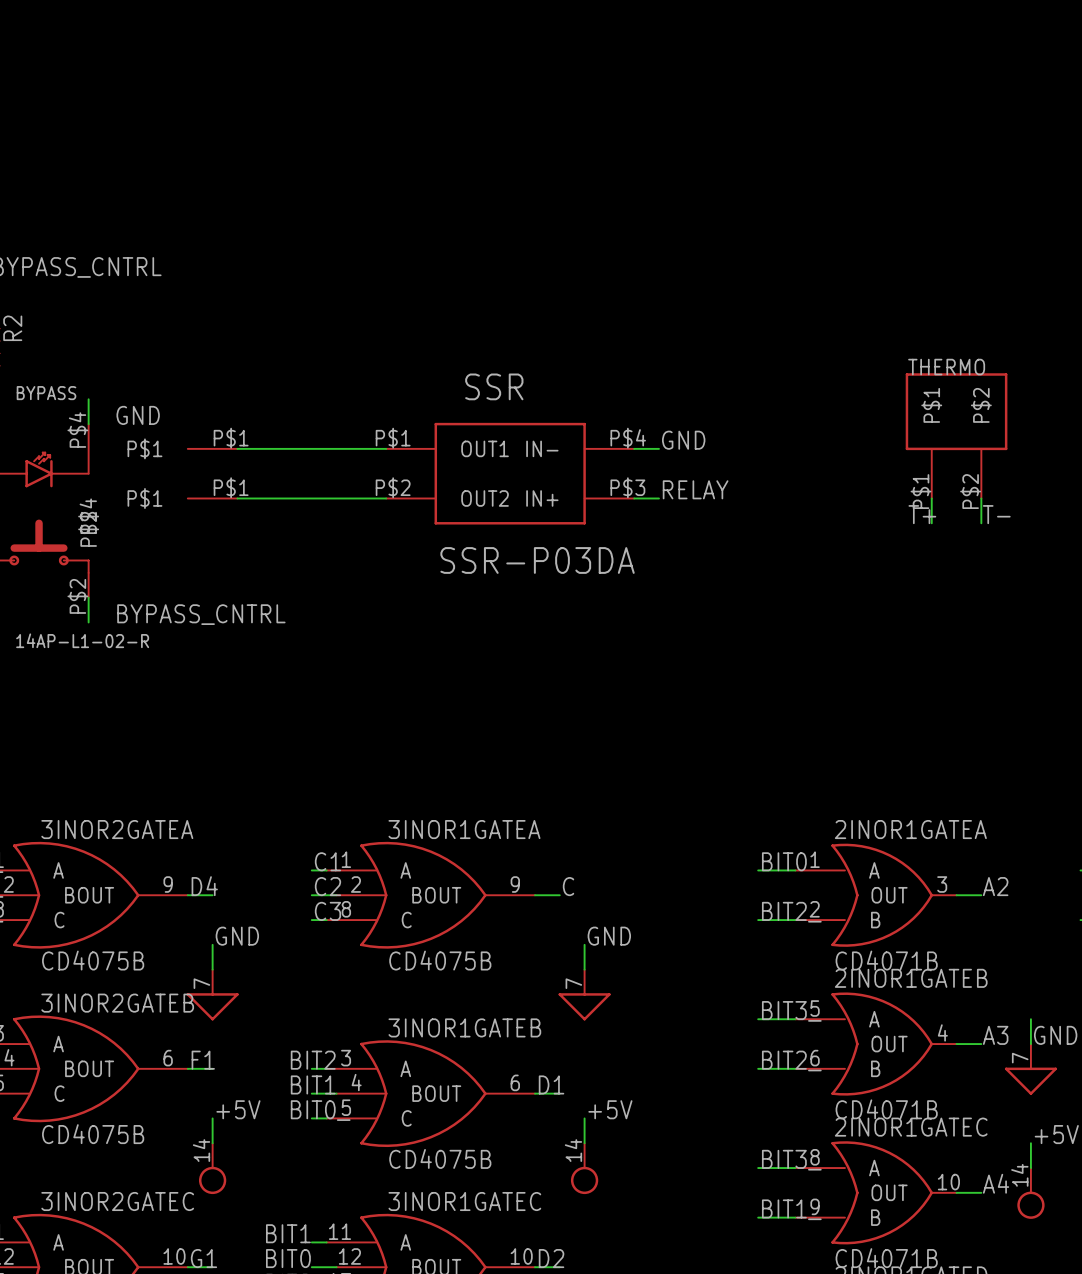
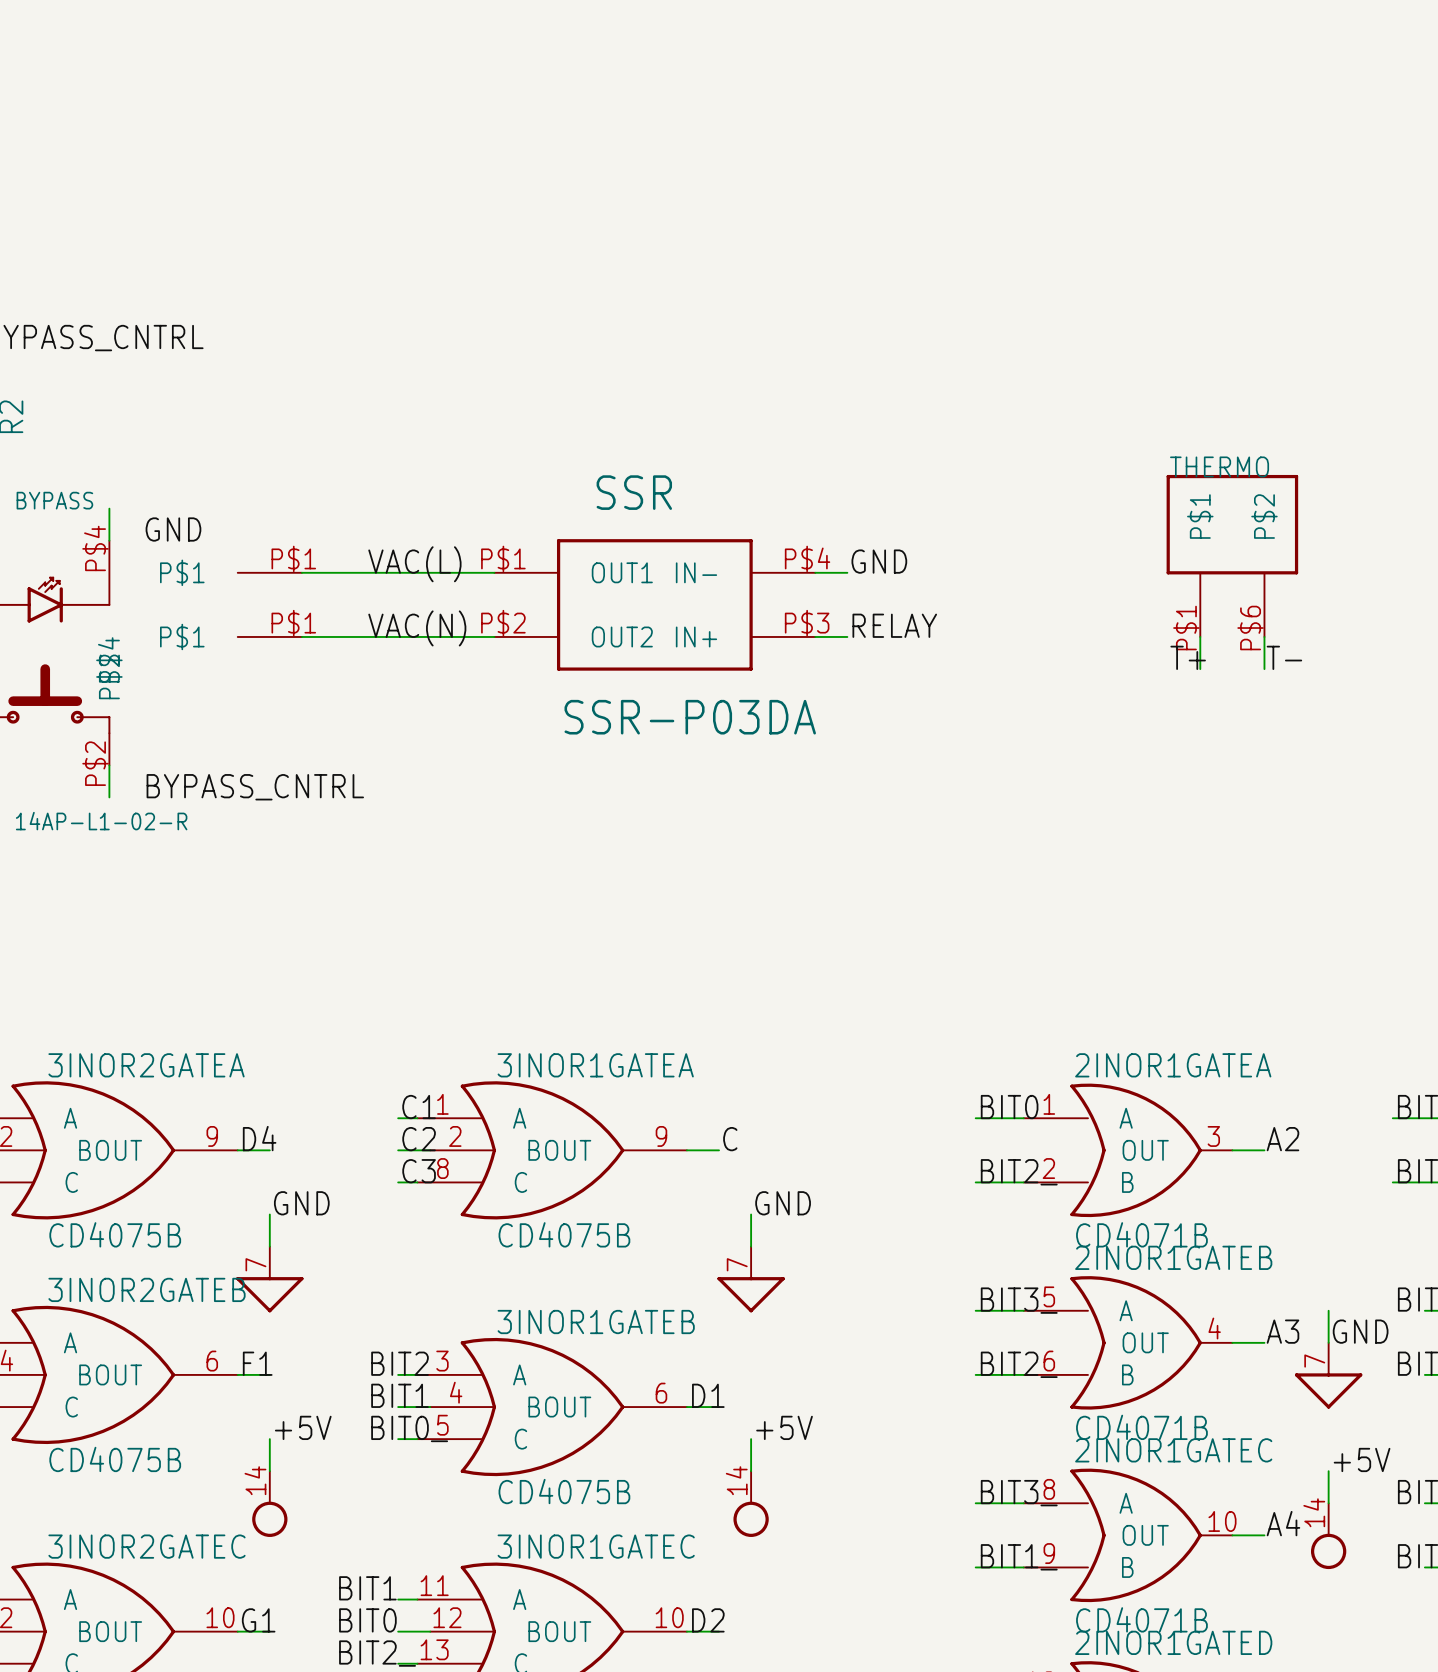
label: none -> VAC(L) (414, 564)
label: none -> VAC(N) (417, 628)
THERMO pin number: P$2 (970, 491) -> P$6 (1250, 628)

